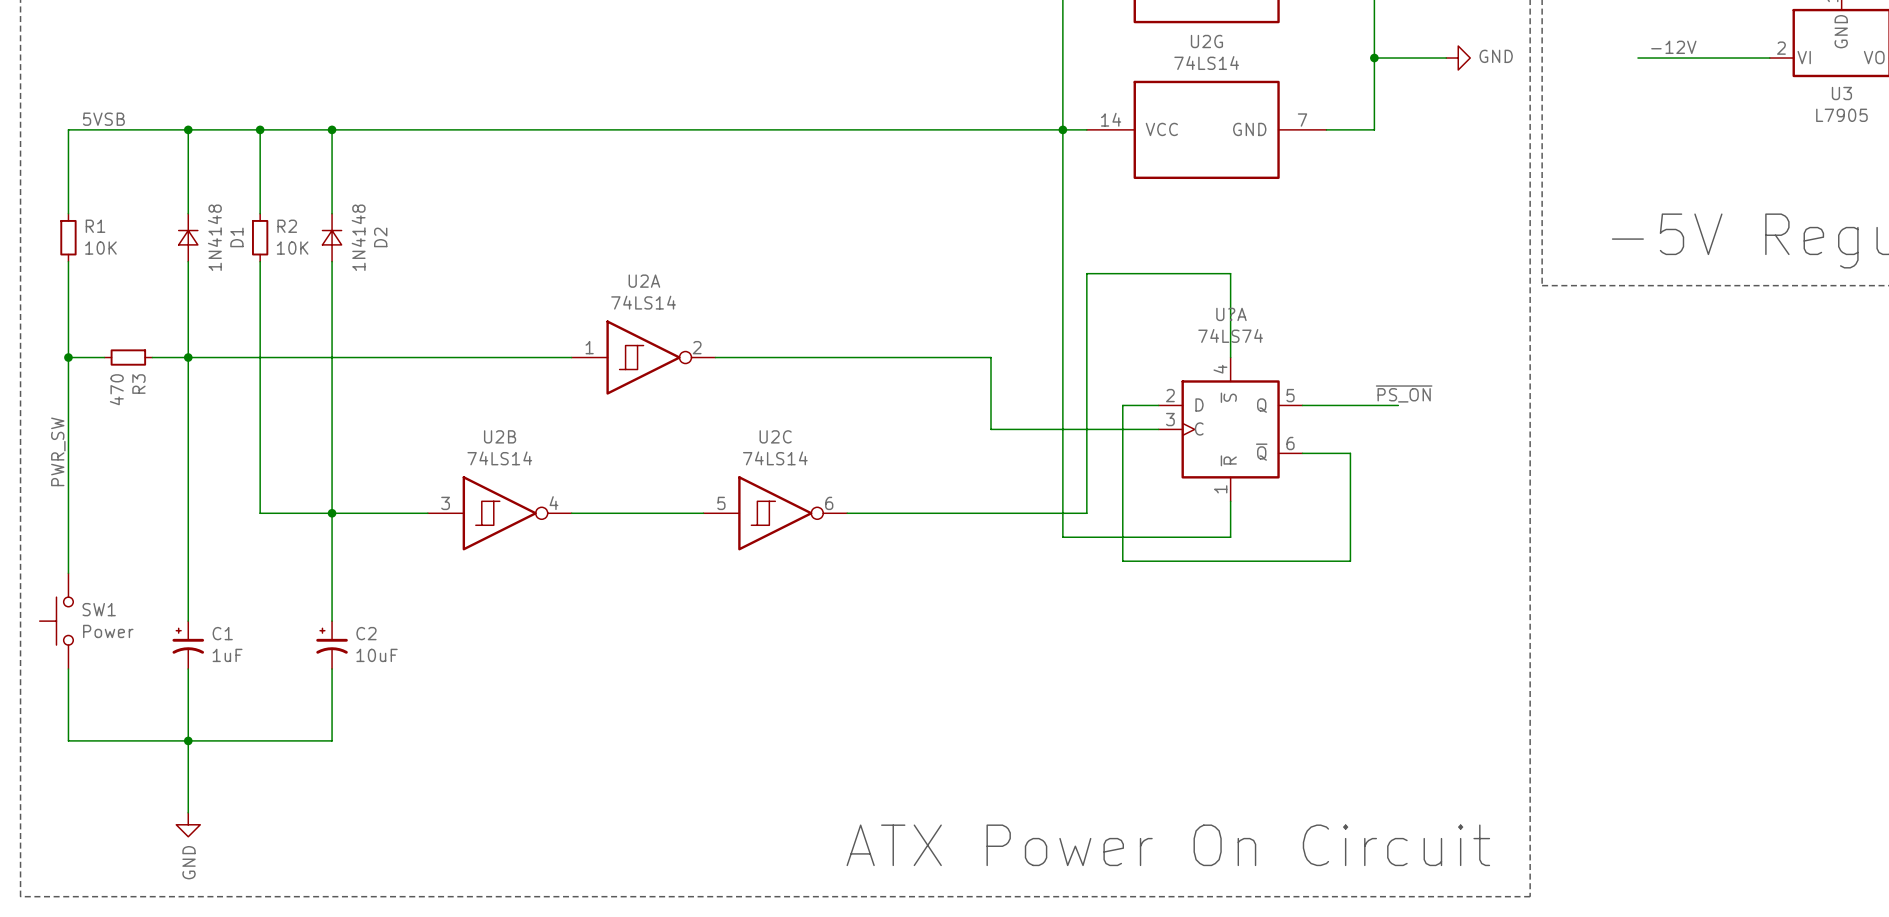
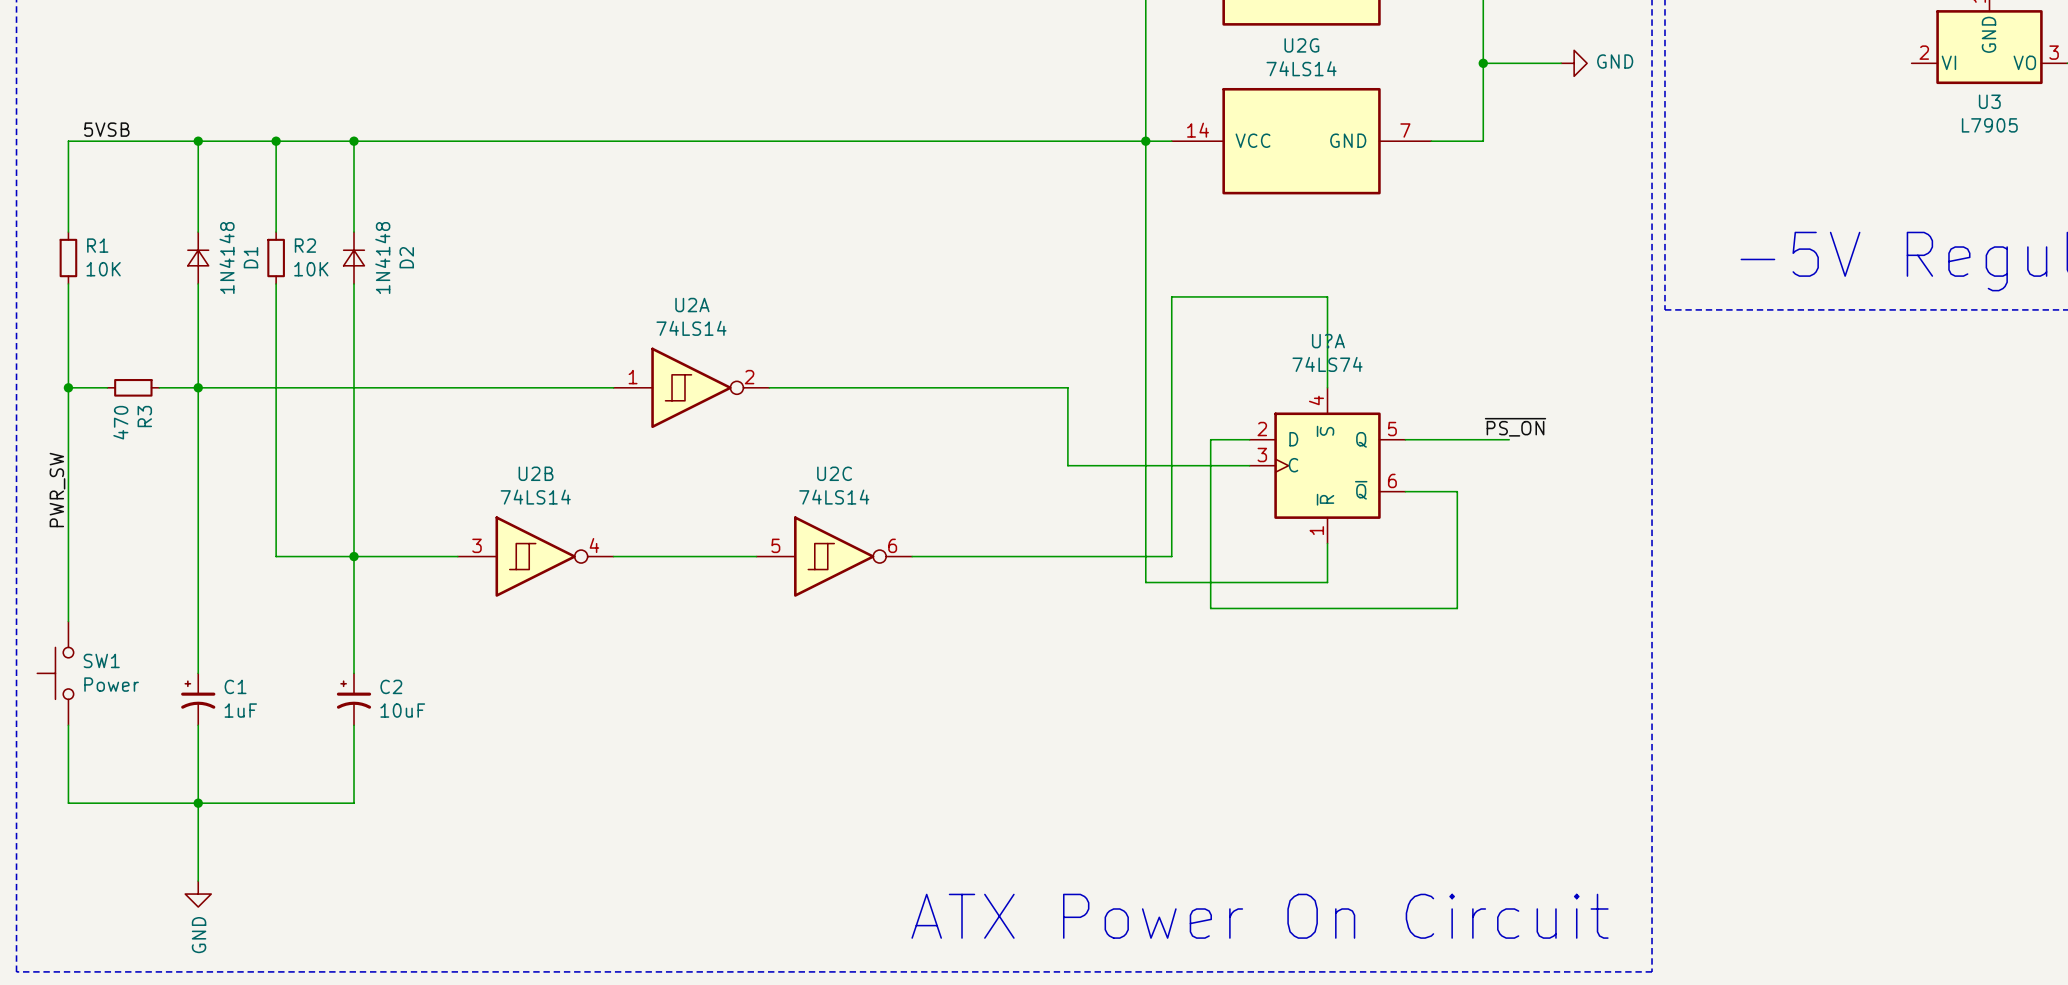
label: -12V (1673, 47) -> none
wire: (1637, 58) (1769, 58) -> none

